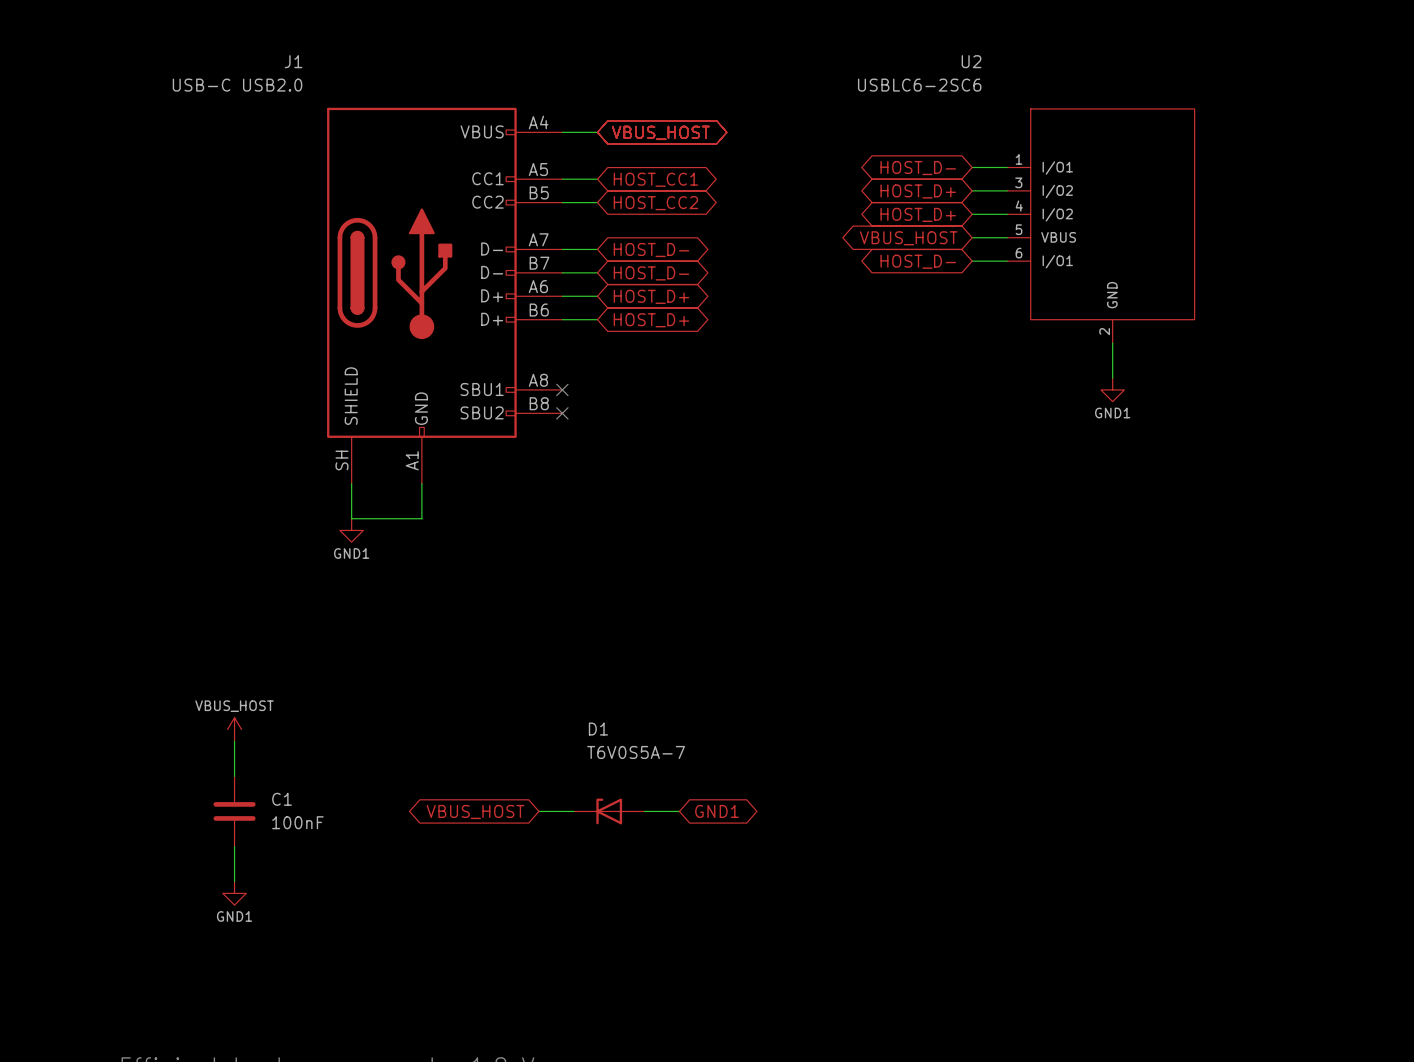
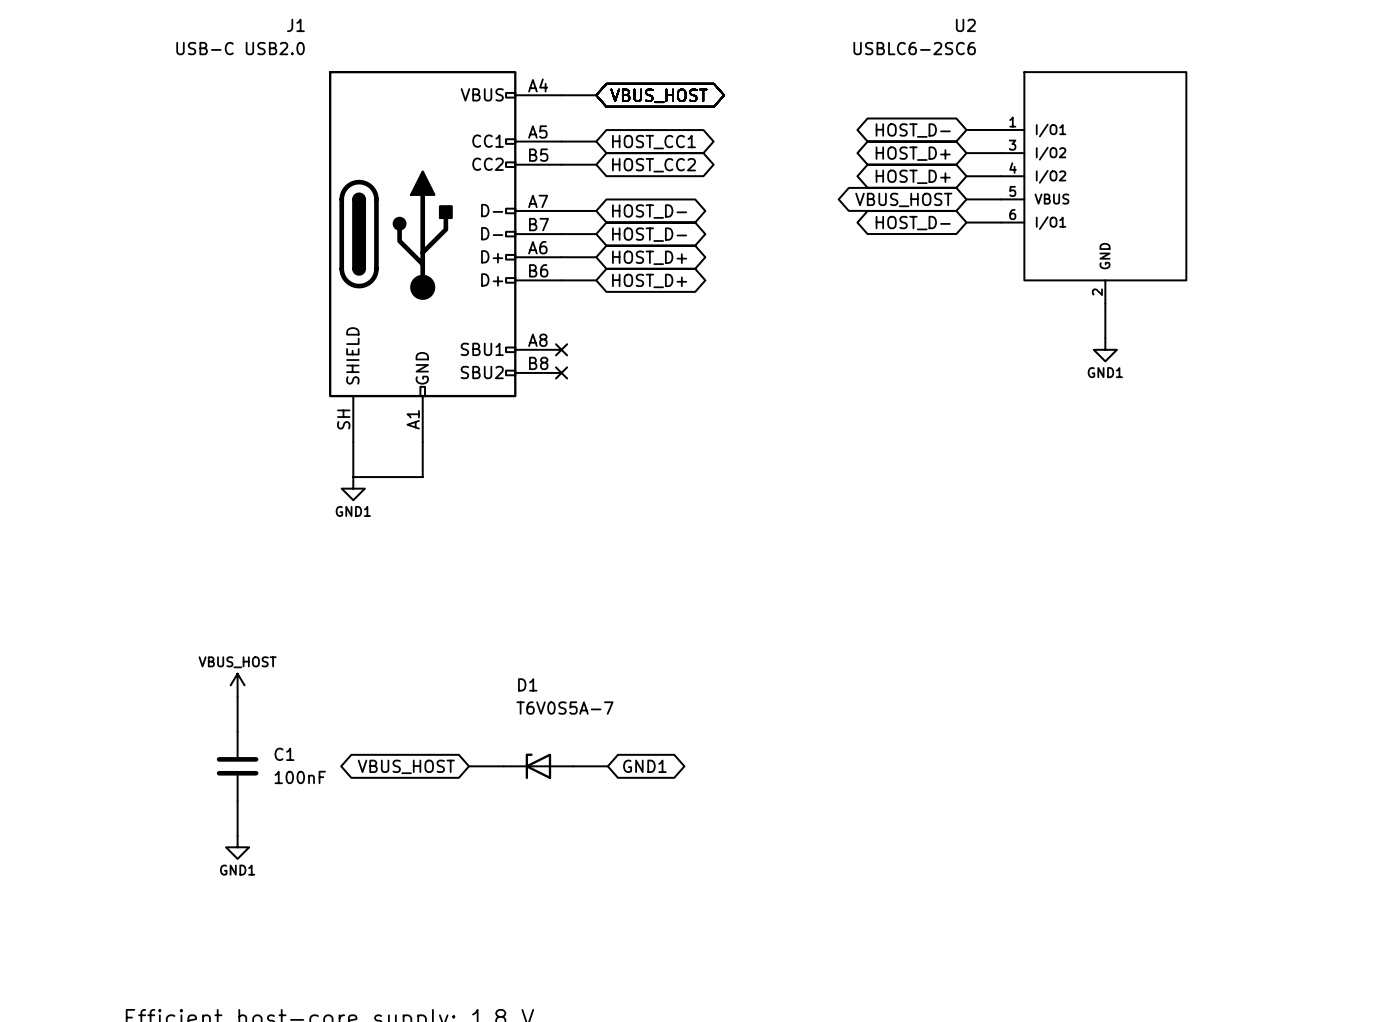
D1 position: (609, 811) -> (538, 766)
wire: (644, 811) (679, 811) -> (469, 766) (503, 766)
global label position: GND1 (716, 811) -> GND1 (644, 766)
global label position: VBUS_HOST (475, 812) -> VBUS_HOST (406, 766)

